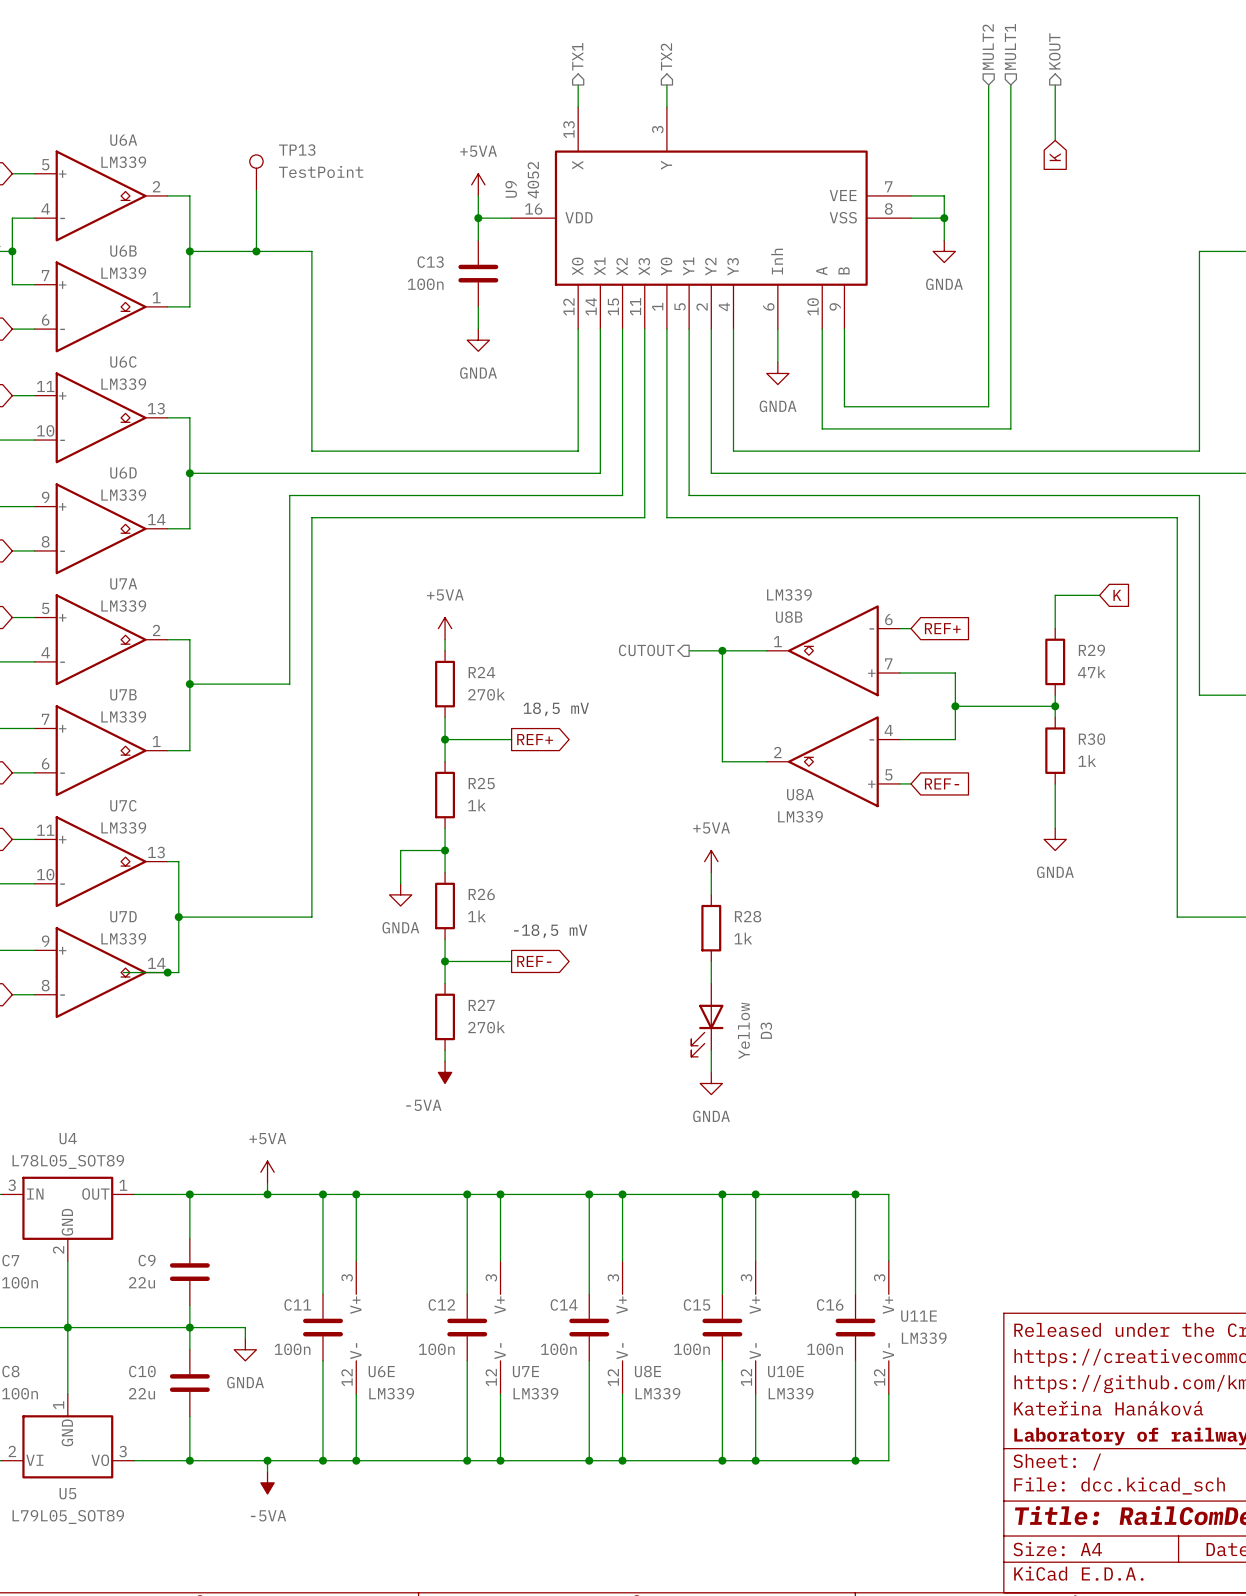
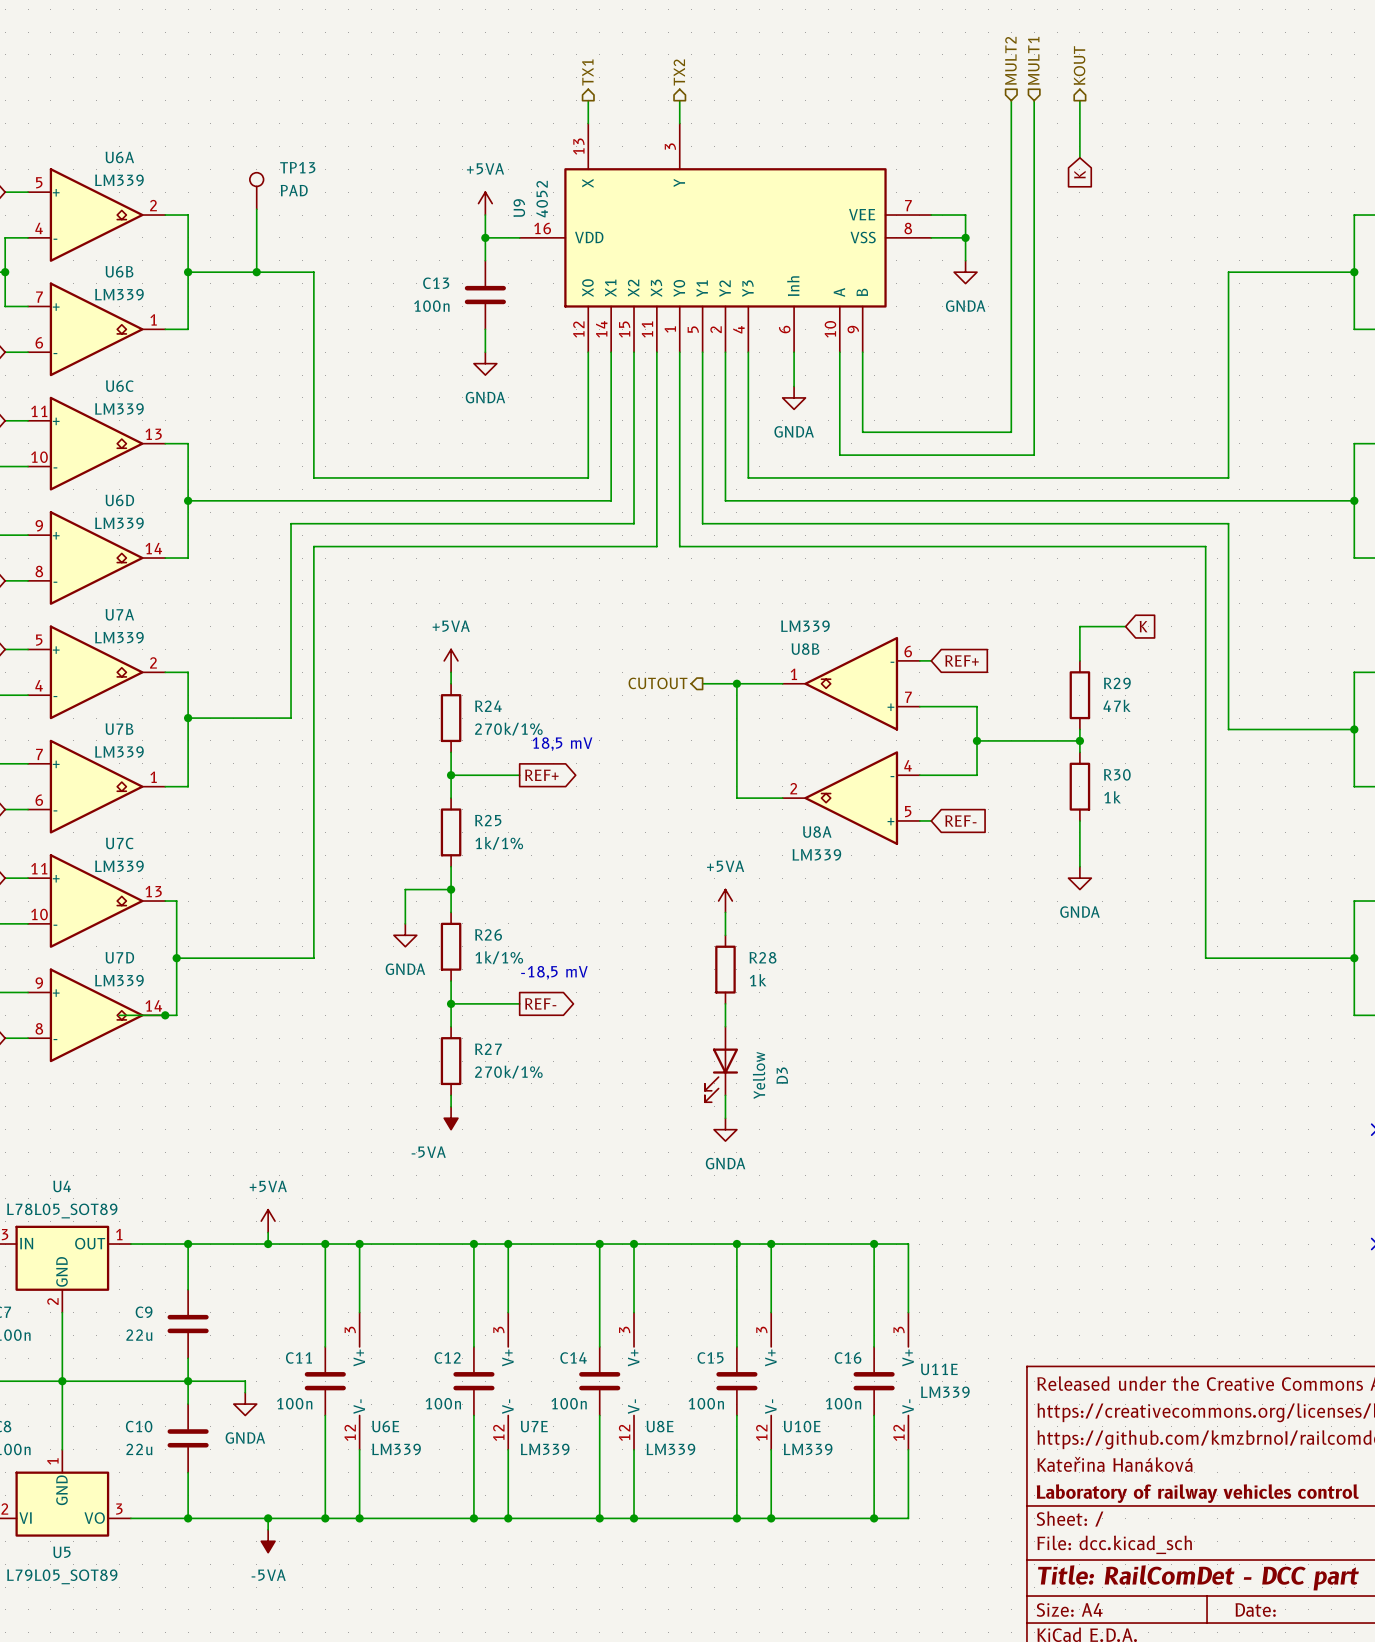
TP13 value: TestPoint (321, 171) -> PAD (294, 190)
R24 value: 270k (486, 694) -> 270k/1% (508, 729)
R25 value: 1k (476, 805) -> 1k/1% (499, 843)
R26 value: 1k (476, 916) -> 1k/1% (499, 957)
R27 value: 270k (486, 1027) -> 270k/1% (508, 1072)

